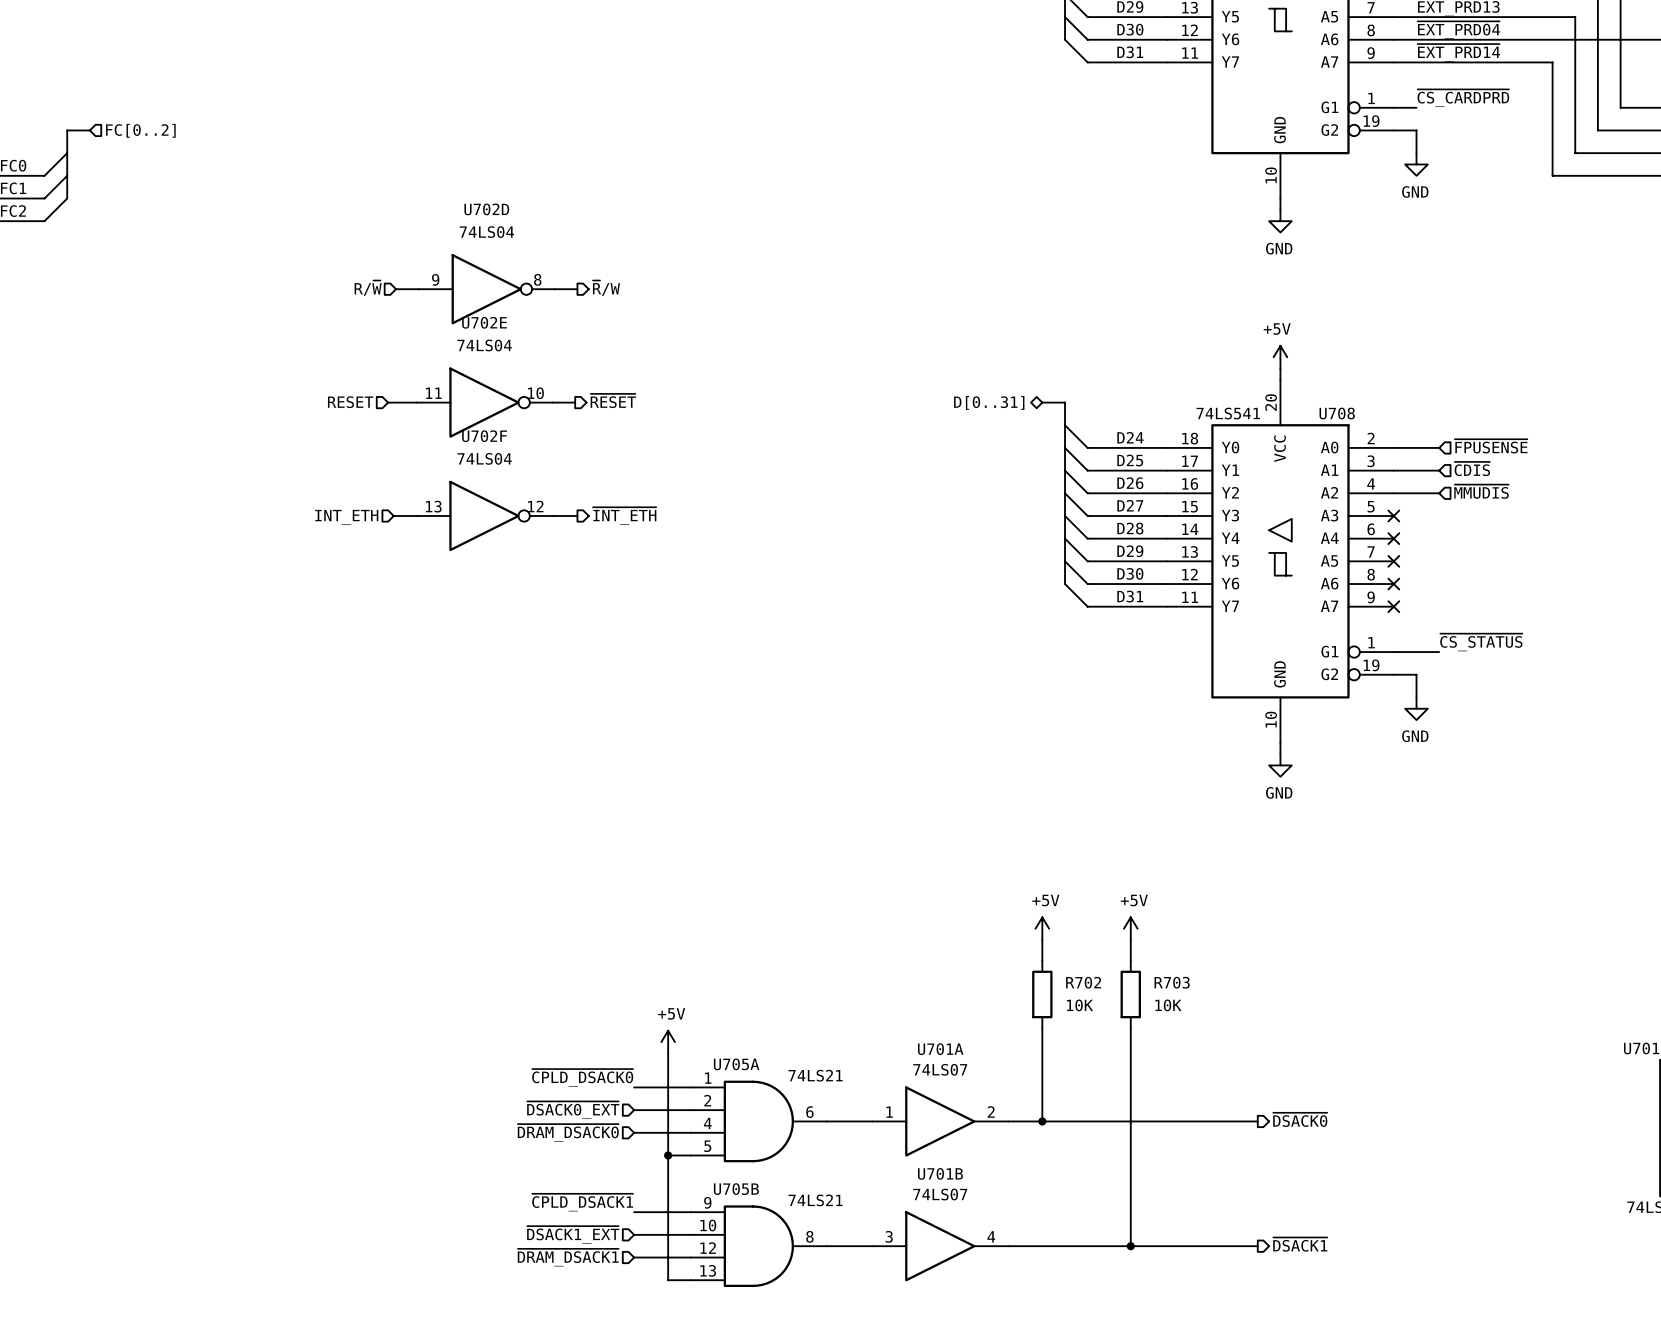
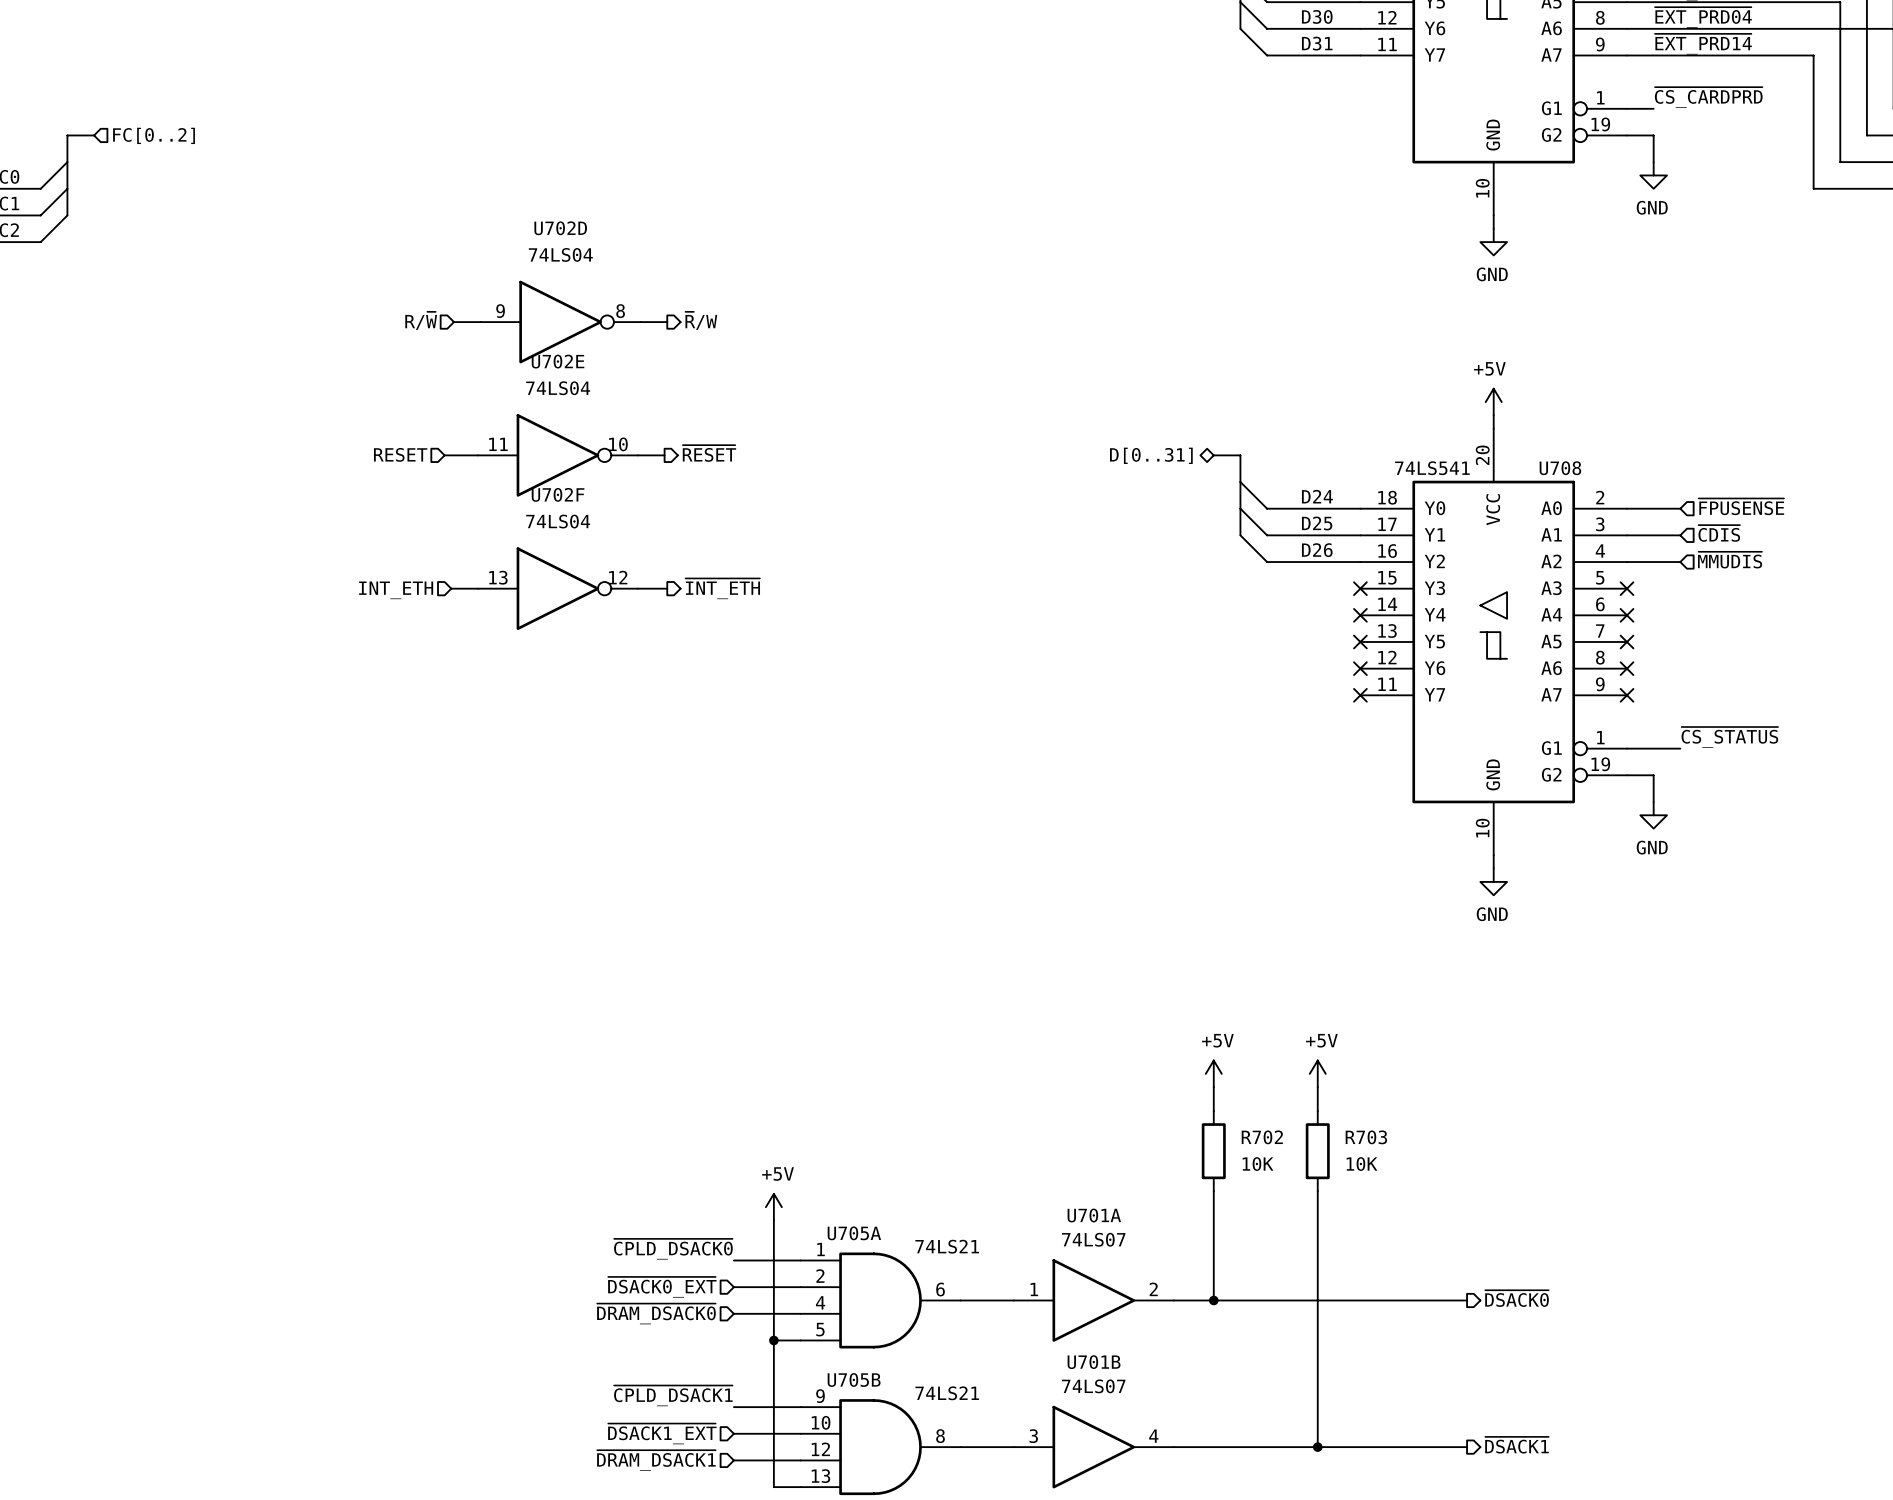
bus: (1065, 470) (1065, 584) -> none
wire: (1065, 493) (1087, 515) (1167, 515) -> none
label: D27 (1130, 505) -> none
wire: (1065, 515) (1087, 538) (1167, 538) -> none
no-connect mark: none -> (1360, 588)
label: D28 (1130, 528) -> none
wire: (1065, 538) (1087, 561) (1167, 561) -> none
no-connect mark: none -> (1360, 615)
label: D29 (1130, 551) -> none
wire: (1065, 561) (1087, 584) (1167, 584) -> none
no-connect mark: none -> (1360, 642)
label: D30 (1130, 573) -> none
wire: (1065, 584) (1087, 606) (1167, 606) -> none
no-connect mark: none -> (1360, 668)
label: D31 (1130, 596) -> none
no-connect mark: none -> (1360, 695)

